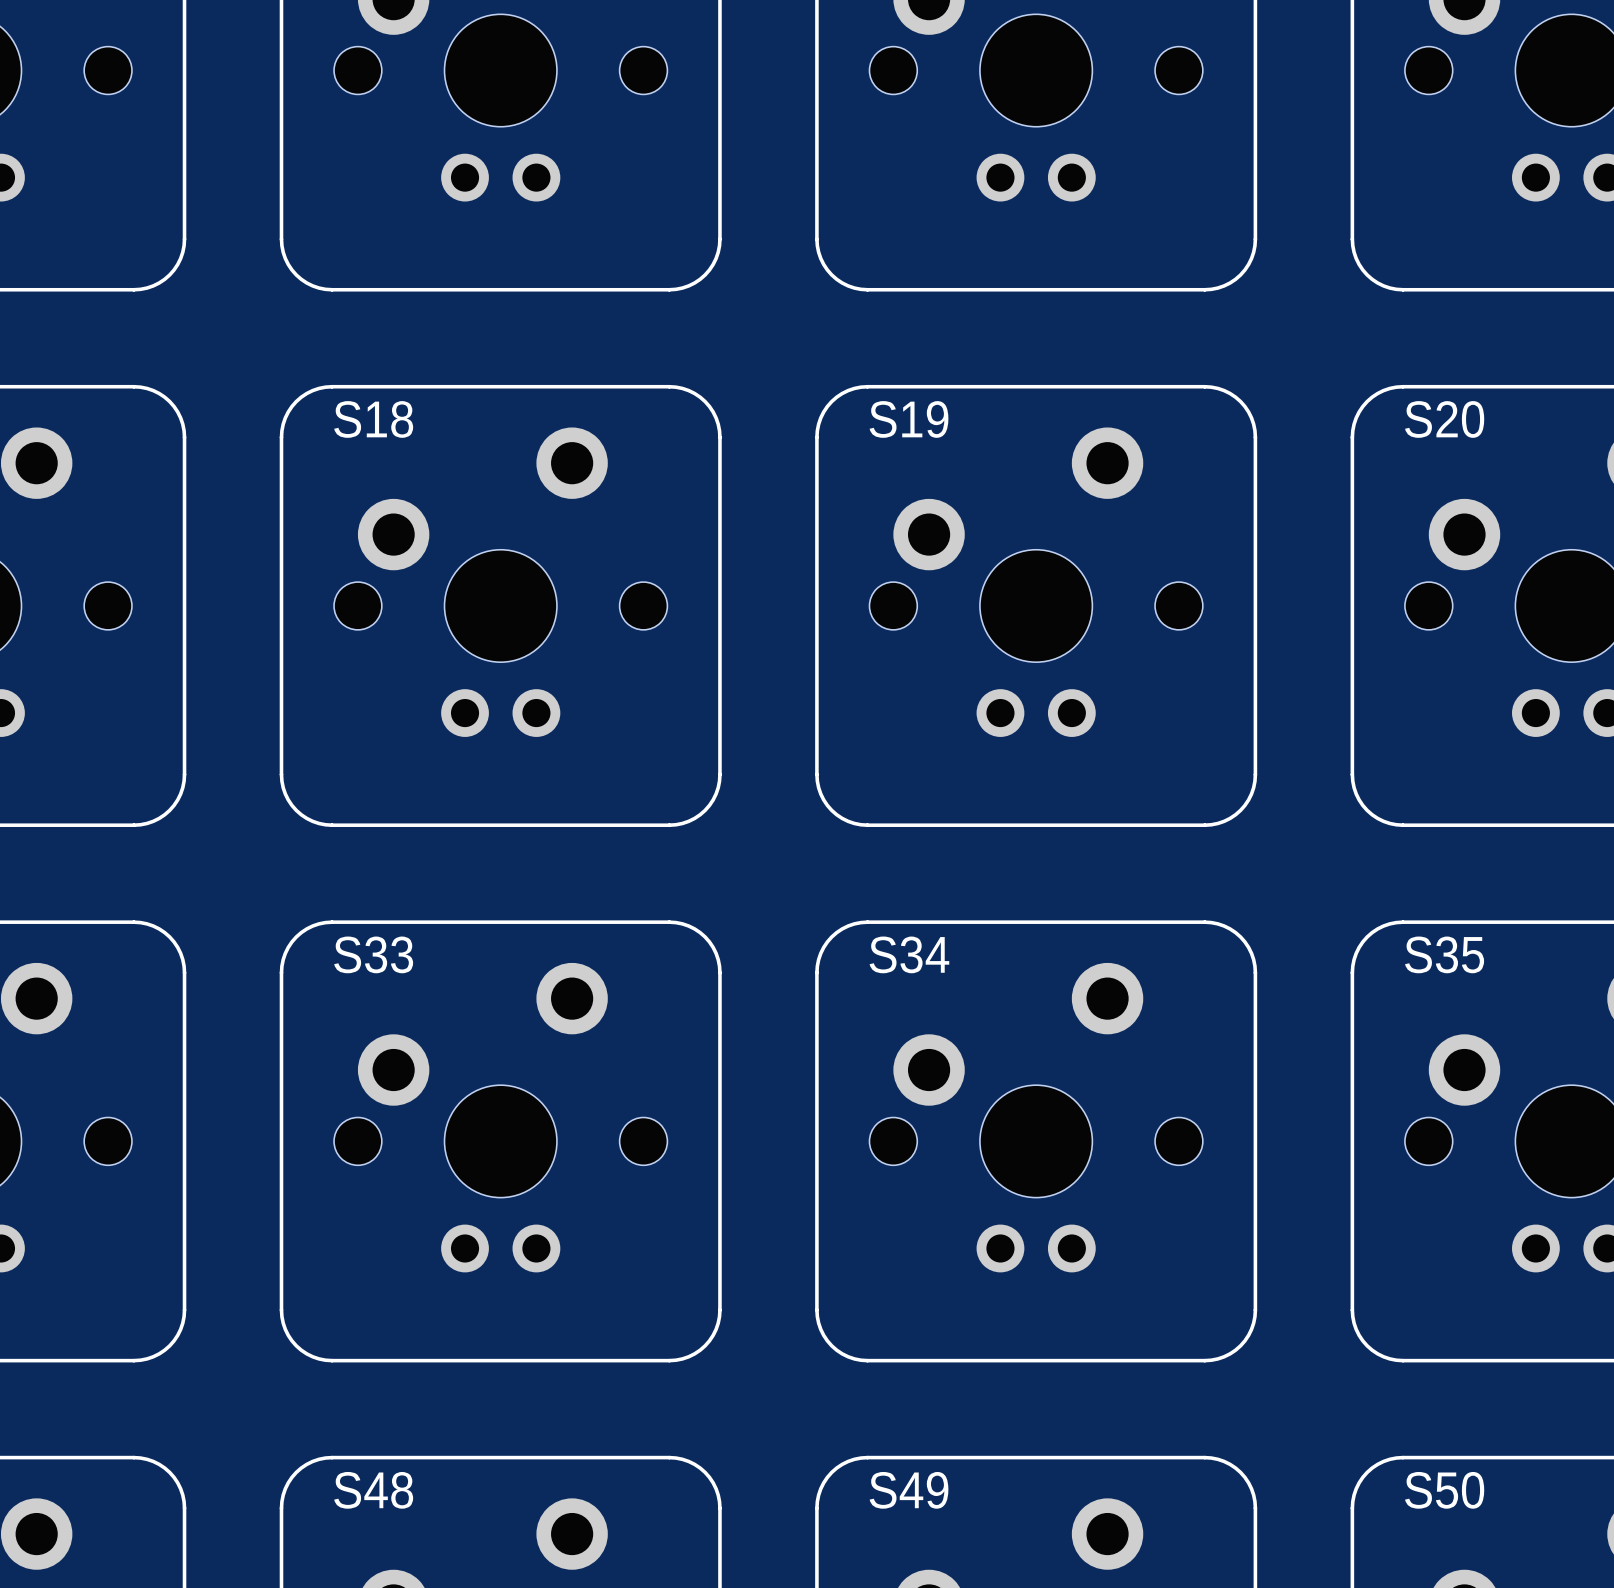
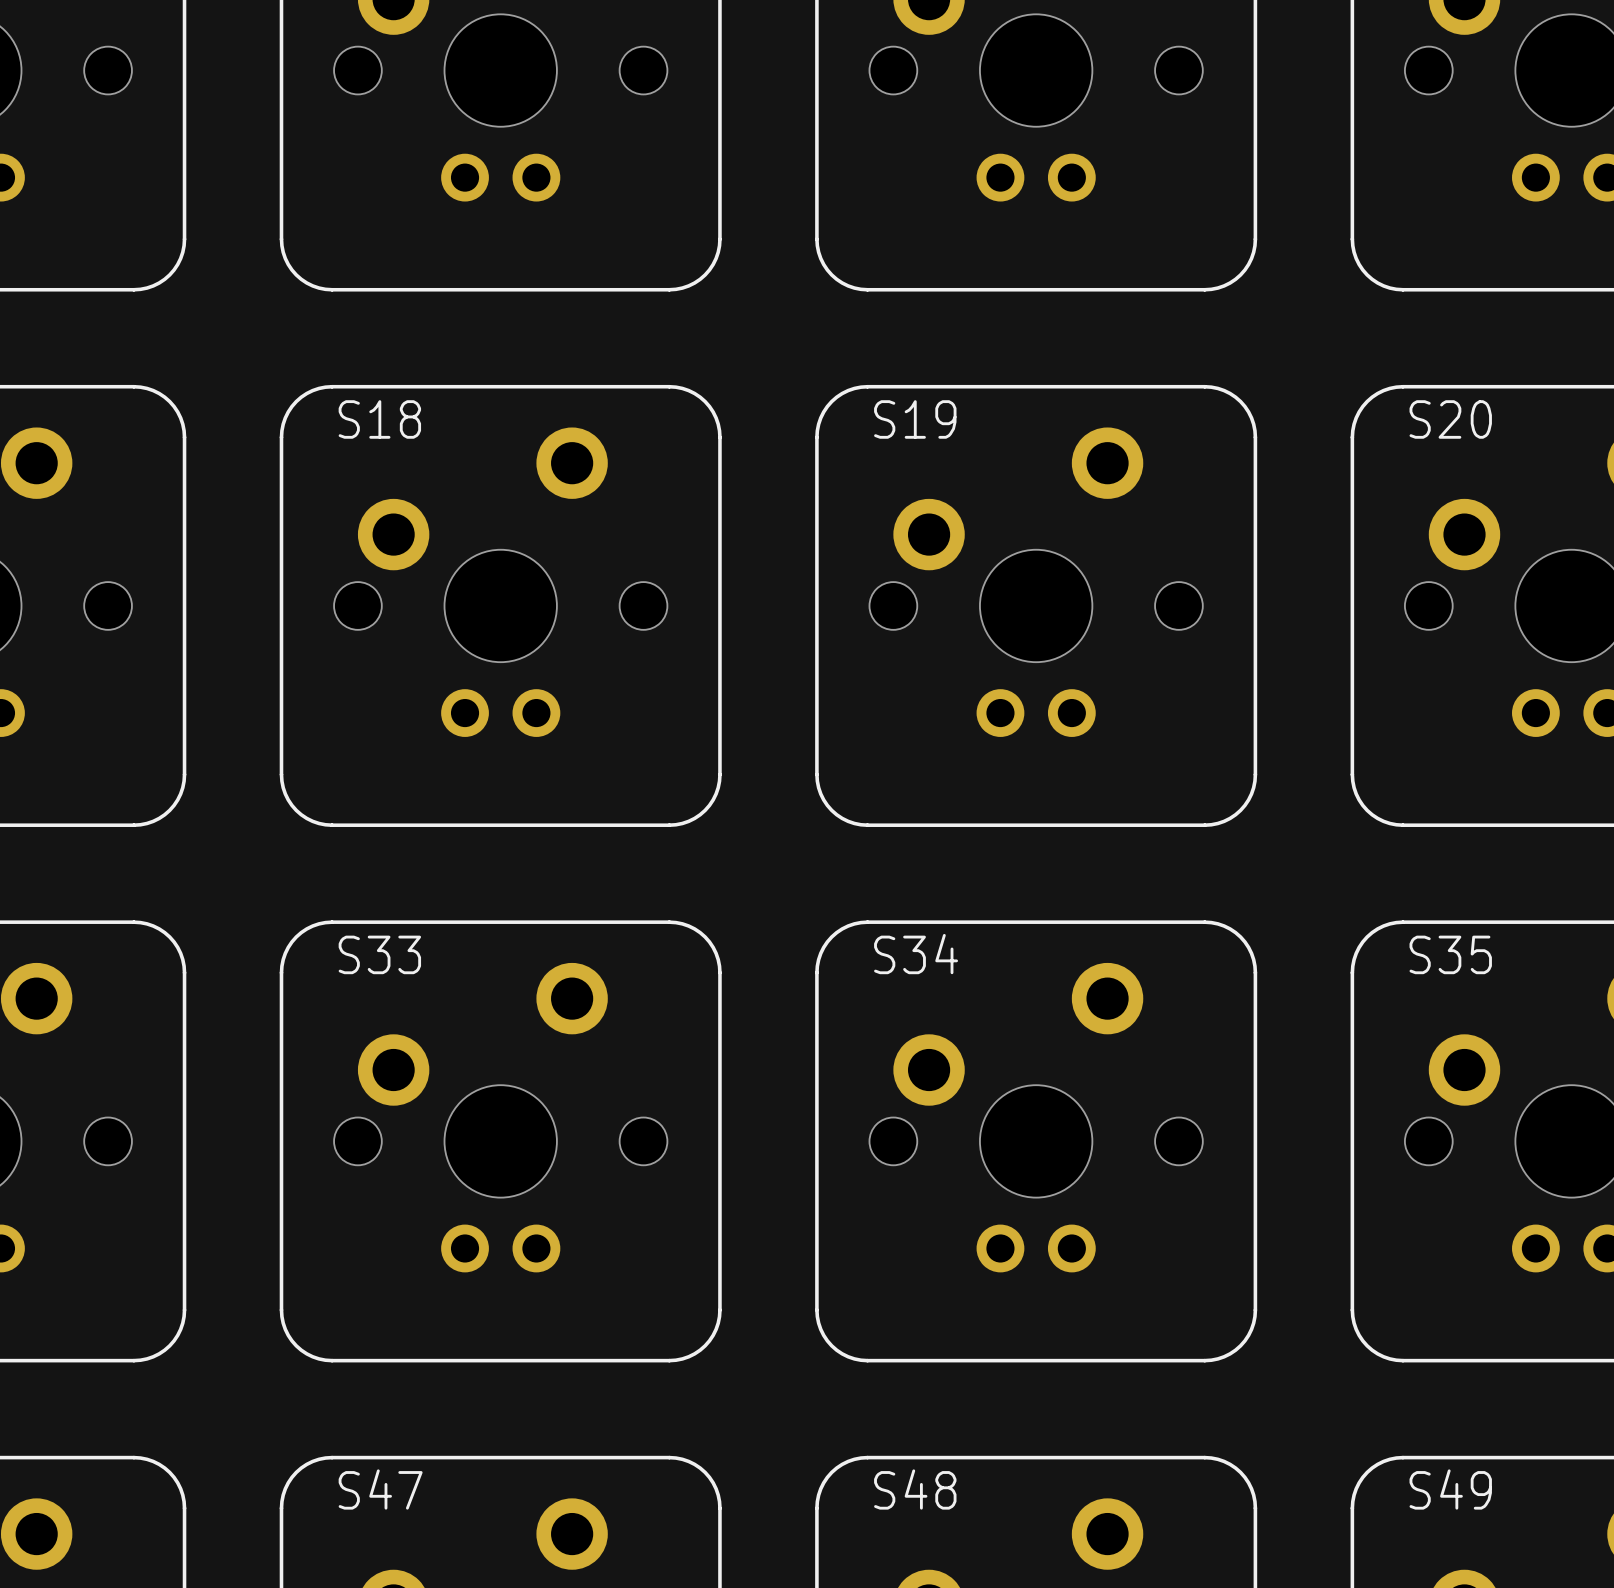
S48 name: S48 (373, 1490) -> S47 (380, 1489)
S49 name: S49 (909, 1490) -> S48 (915, 1489)
S50 name: S50 (1444, 1490) -> S49 (1450, 1489)

